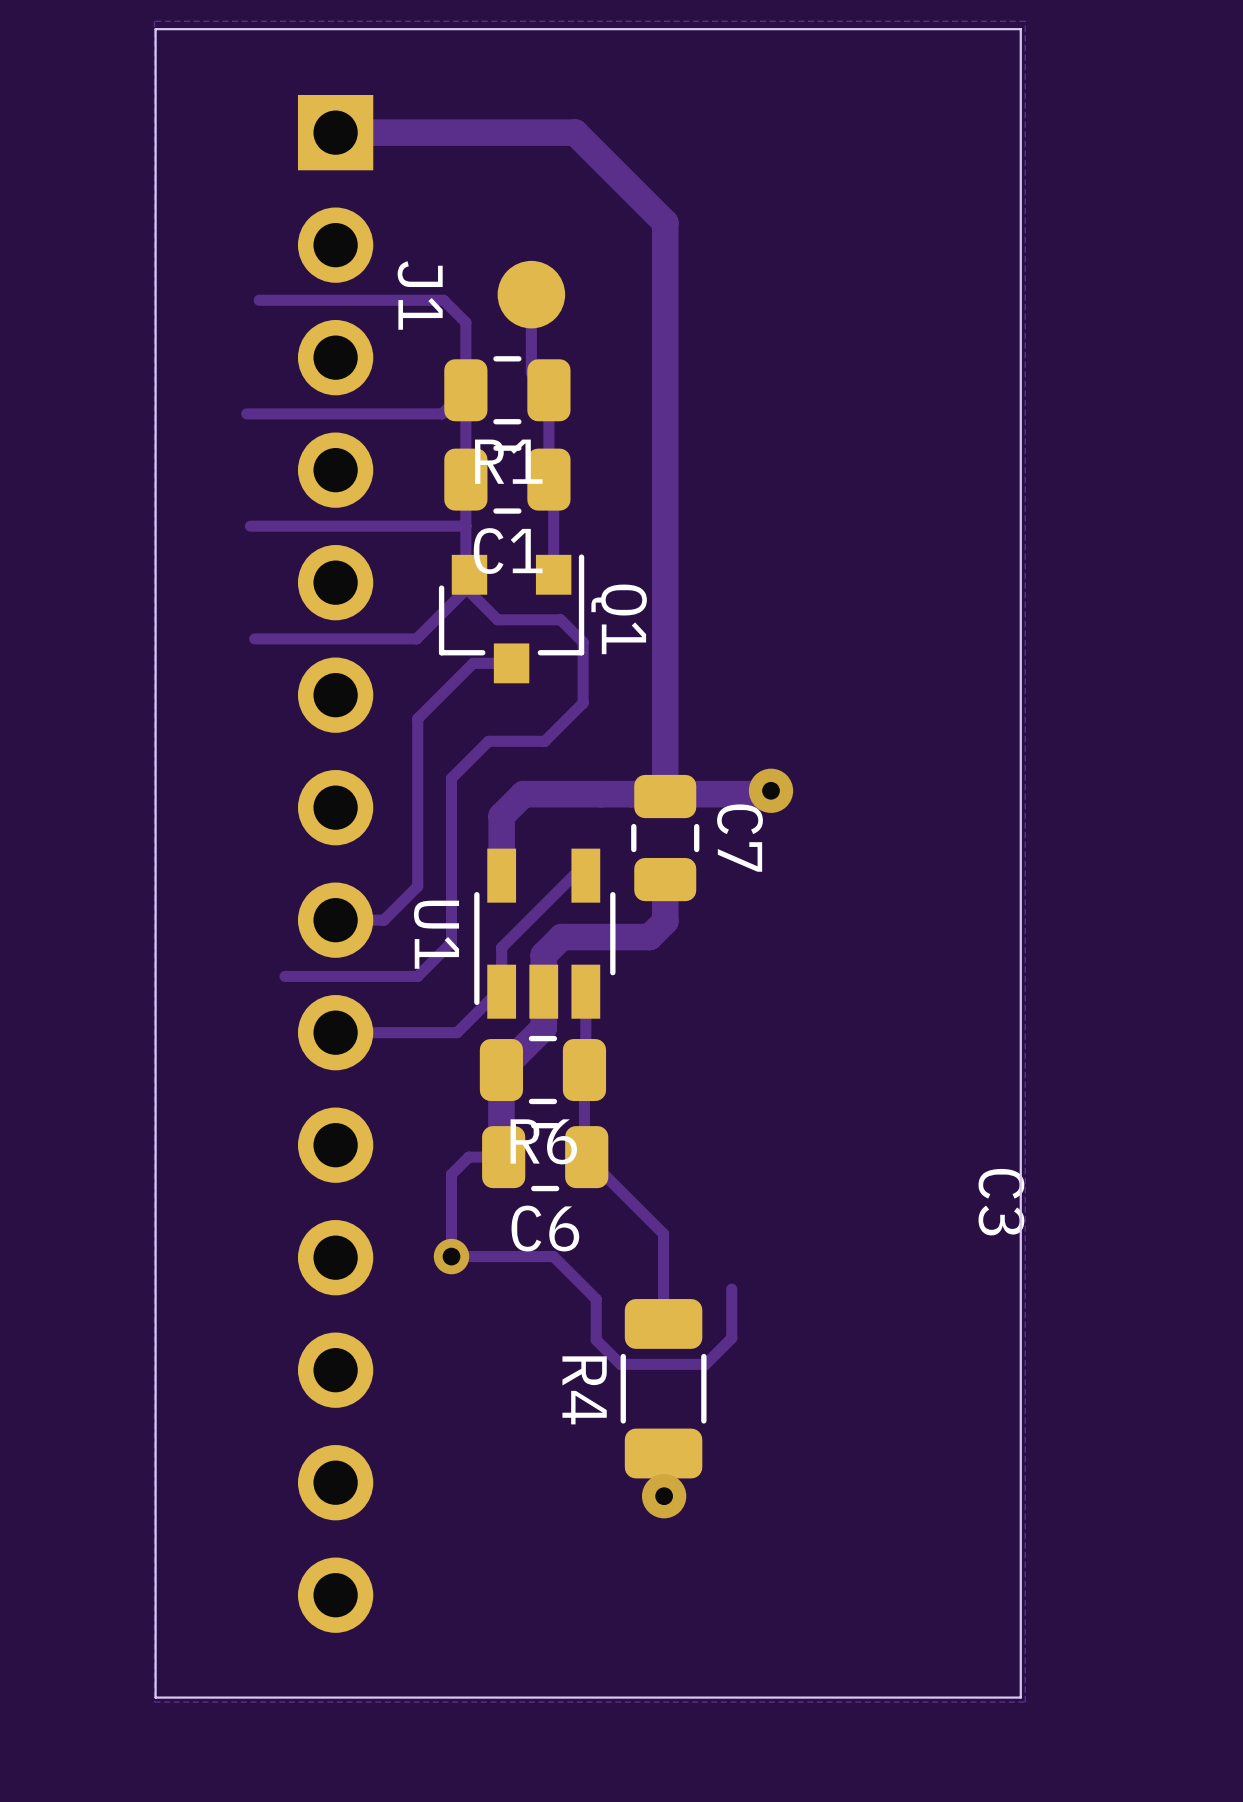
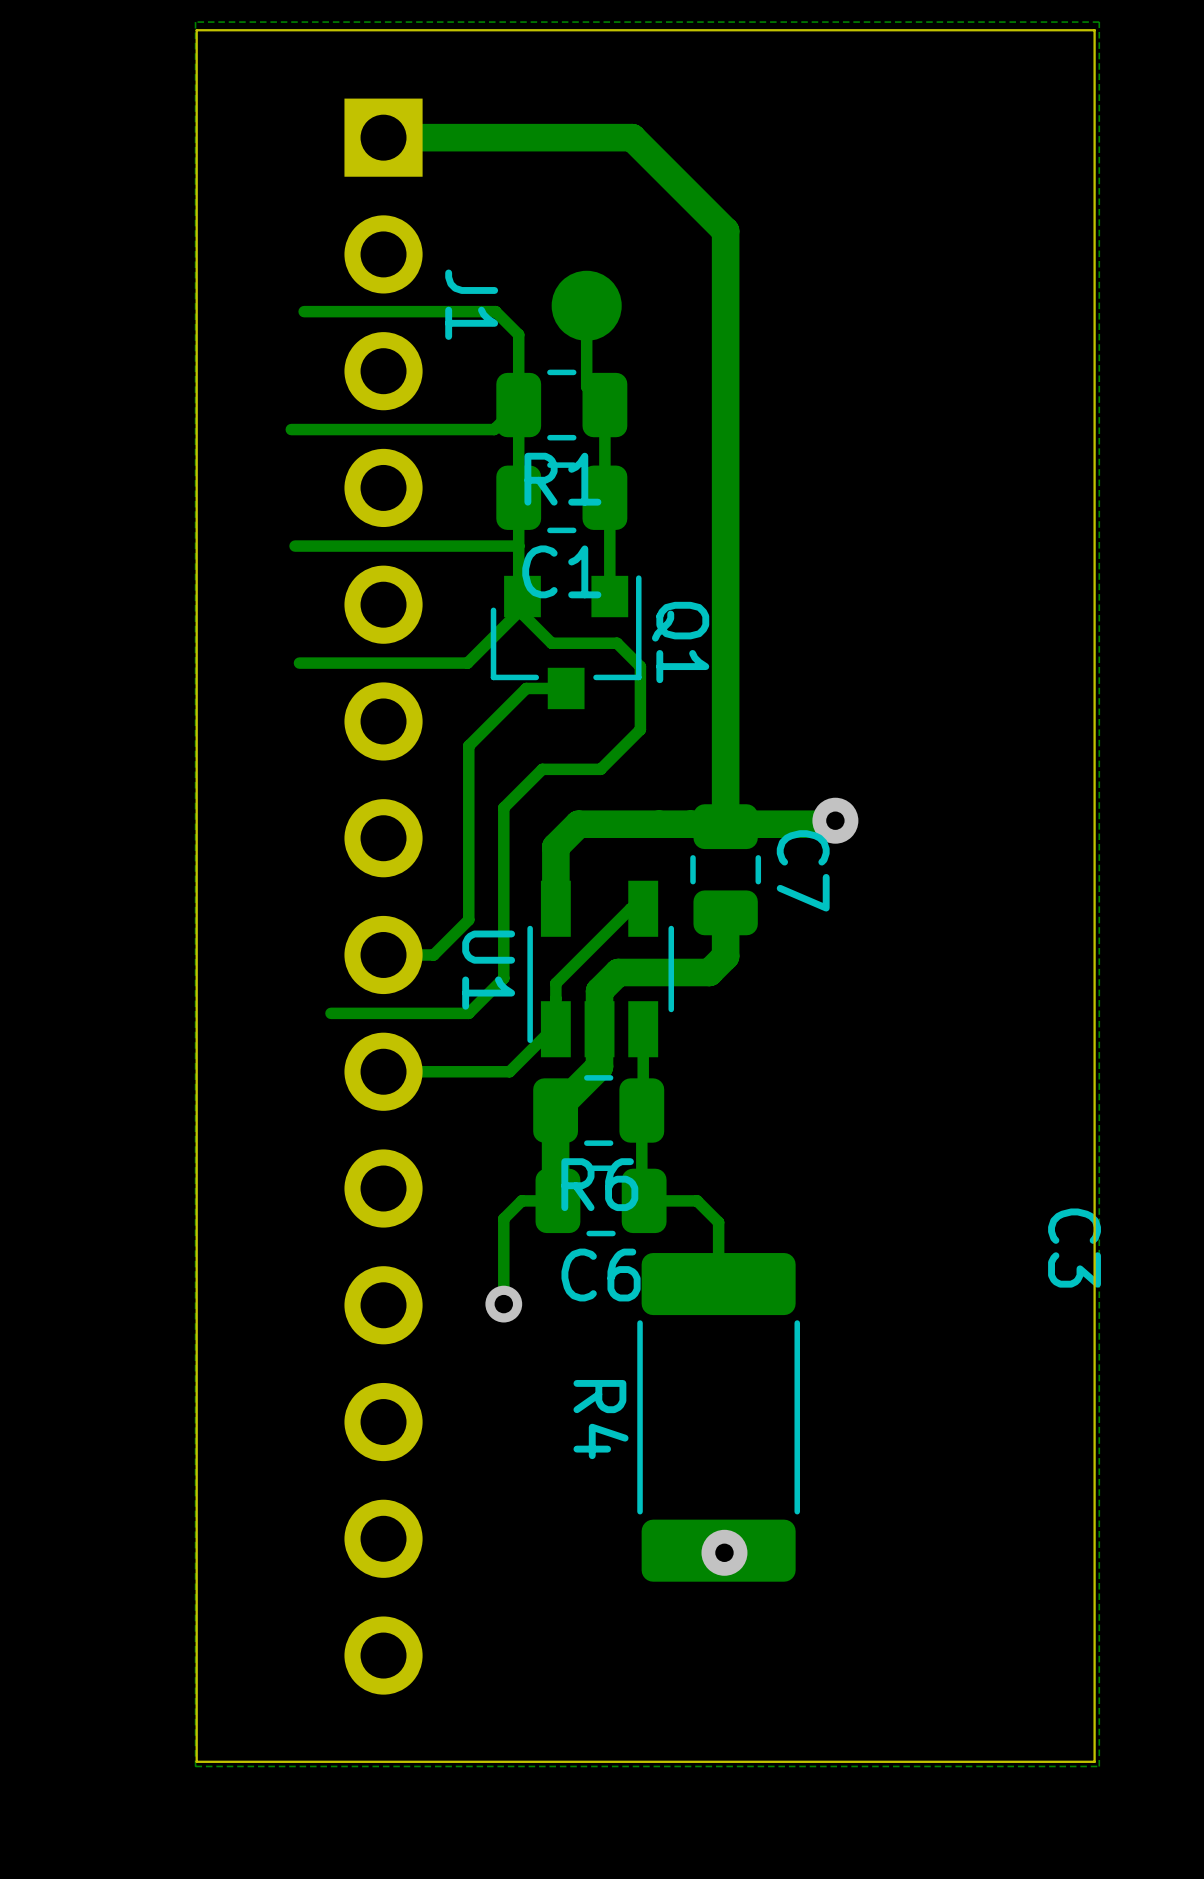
track: (586, 1157) (663, 1233) (663, 1323) -> (644, 1200) (697, 1200) (718, 1222) (718, 1284)
track: (451, 1256) (553, 1256) (596, 1299) (596, 1340) (620, 1364) (705, 1364) (731, 1338) (731, 1289) -> none
R4 footprint: [620, 1299, 707, 1479] -> [637, 1253, 801, 1582]

